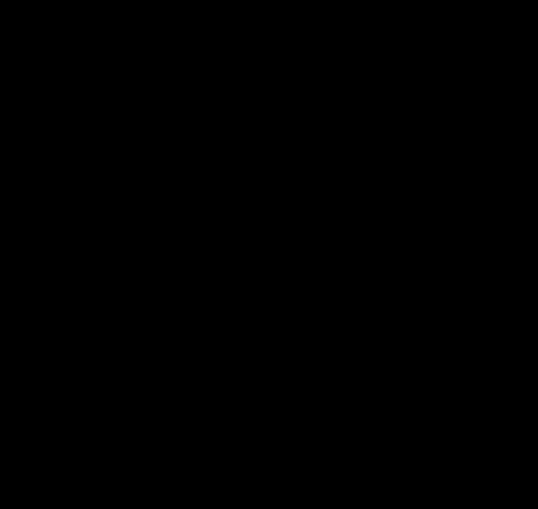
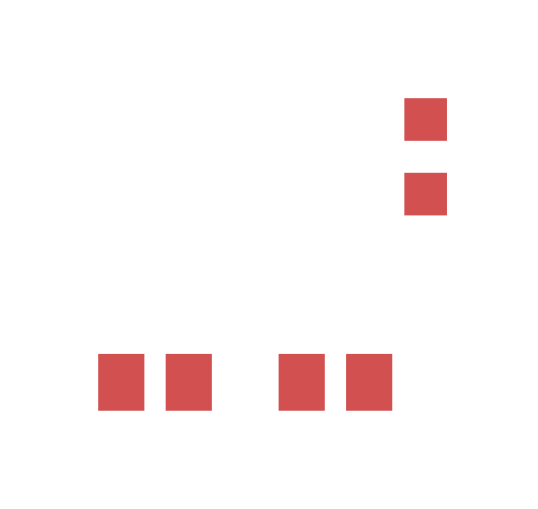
part: none -> (425, 156)
part: none -> (155, 382)
part: none -> (335, 382)

